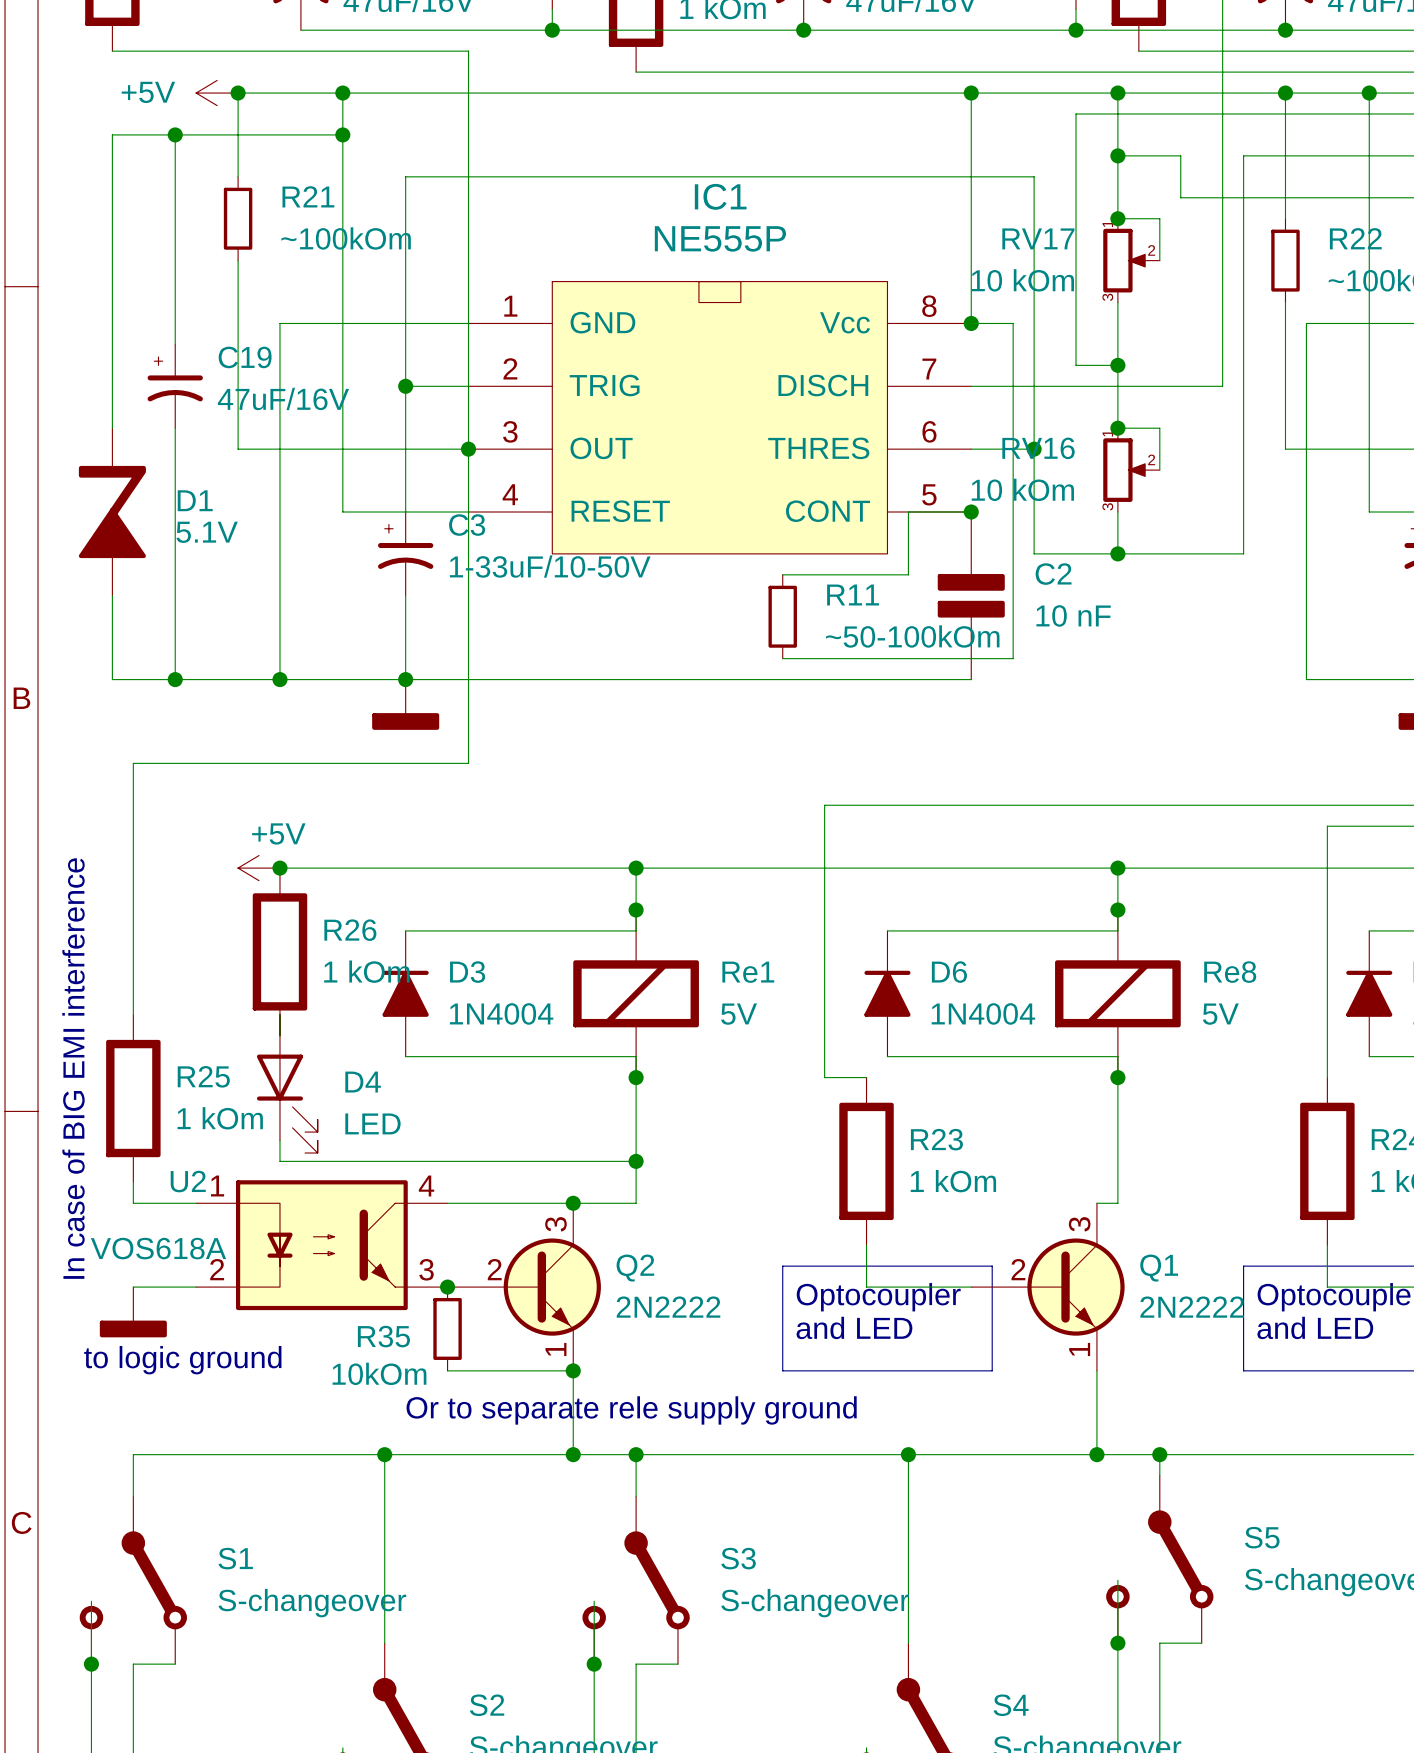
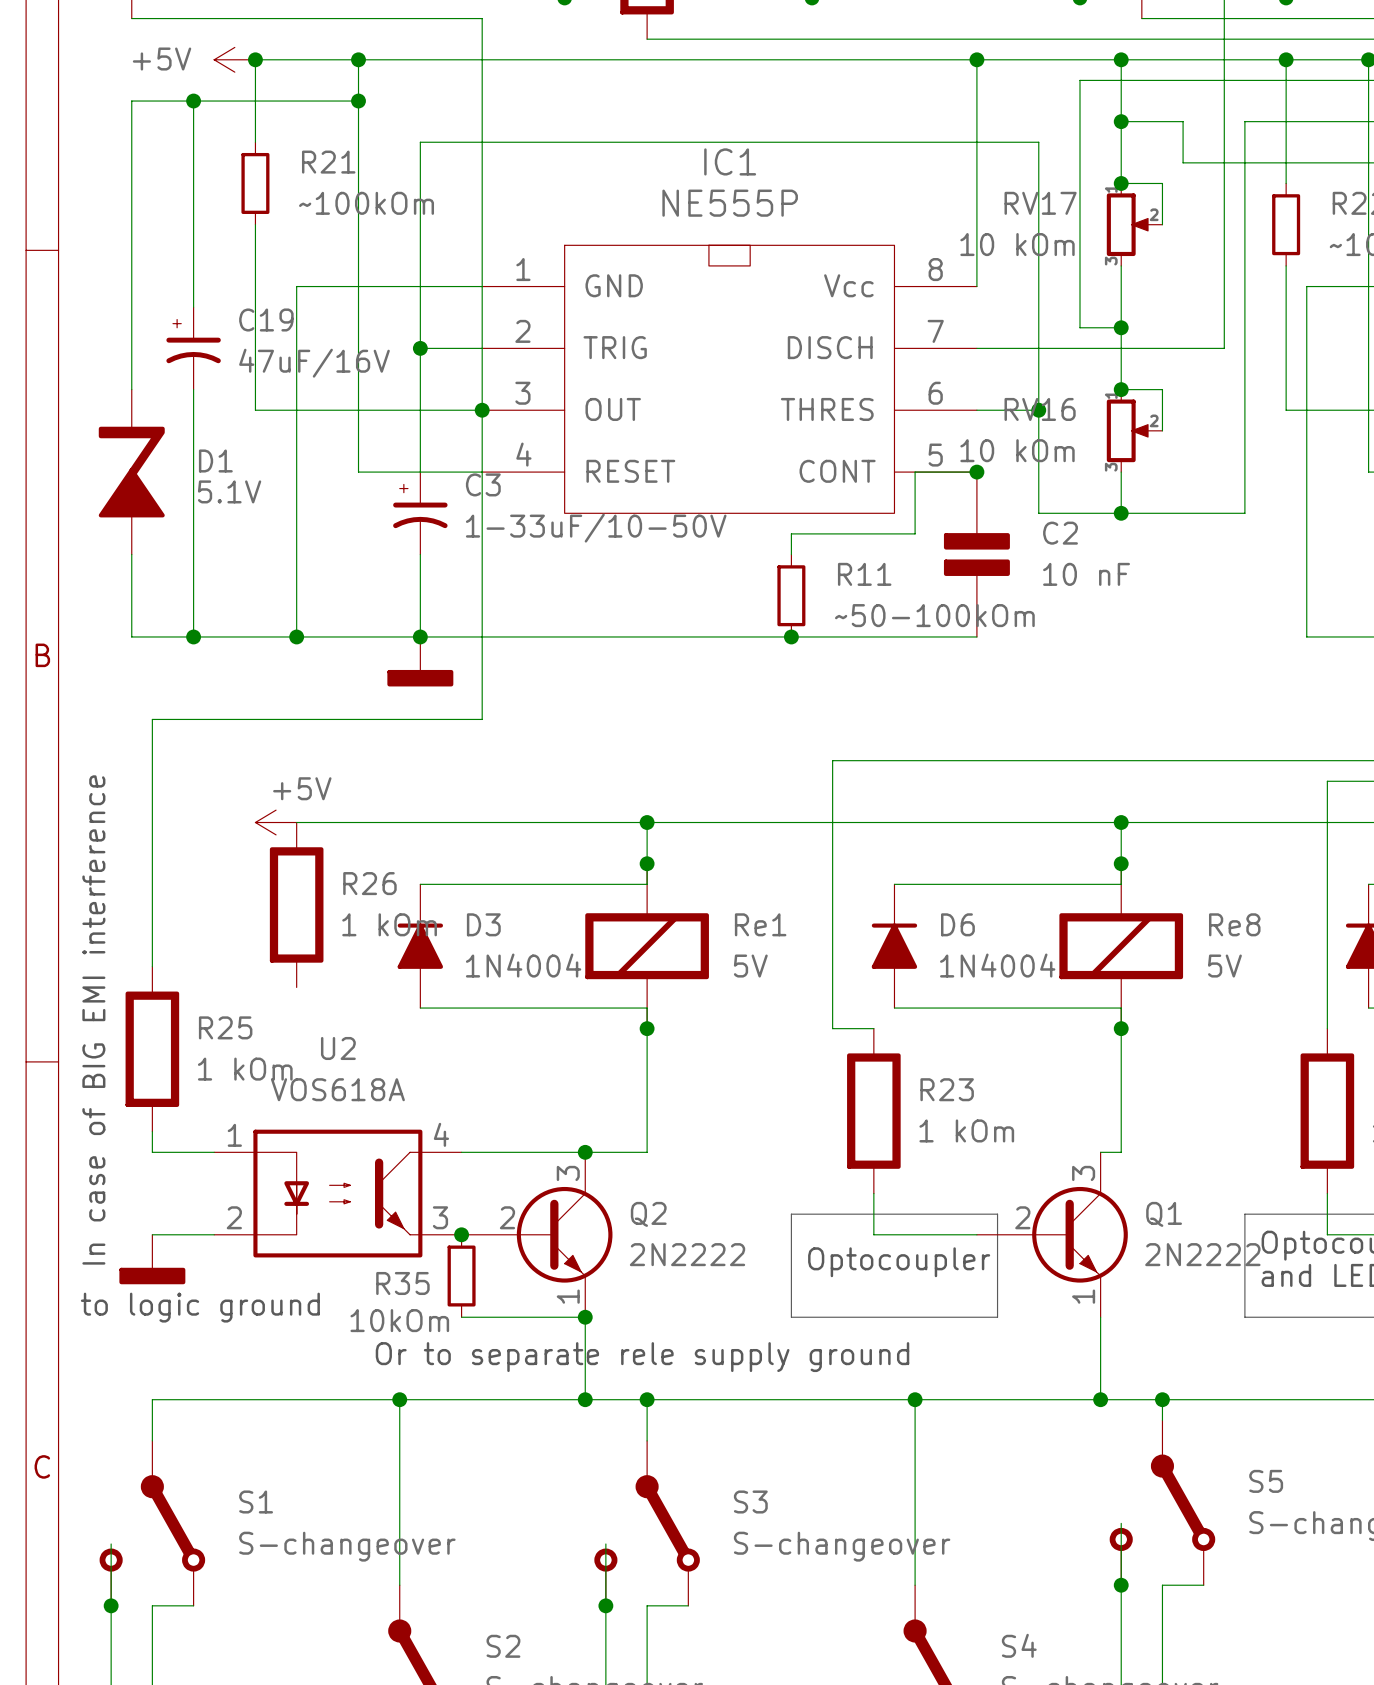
wire: (971, 323) (1013, 323) (1013, 658) (782, 658) -> none
junction: (971, 323) -> none
R11 position: (782, 616) -> (791, 595)
junction: none -> (791, 636)
junction: (279, 868) -> none
D4: LED (287, 1083) -> none
wire: (279, 1140) (279, 1161) (636, 1161) -> none
junction: (636, 1161) -> none
U2 name position: U2 (188, 1181) -> U2 (338, 1048)
U2 value position: VOS618A (158, 1248) -> VOS618A (337, 1089)
text position: Optocoupler (878, 1297) -> Optocoupler (899, 1262)
text: and LED (854, 1327) -> none

